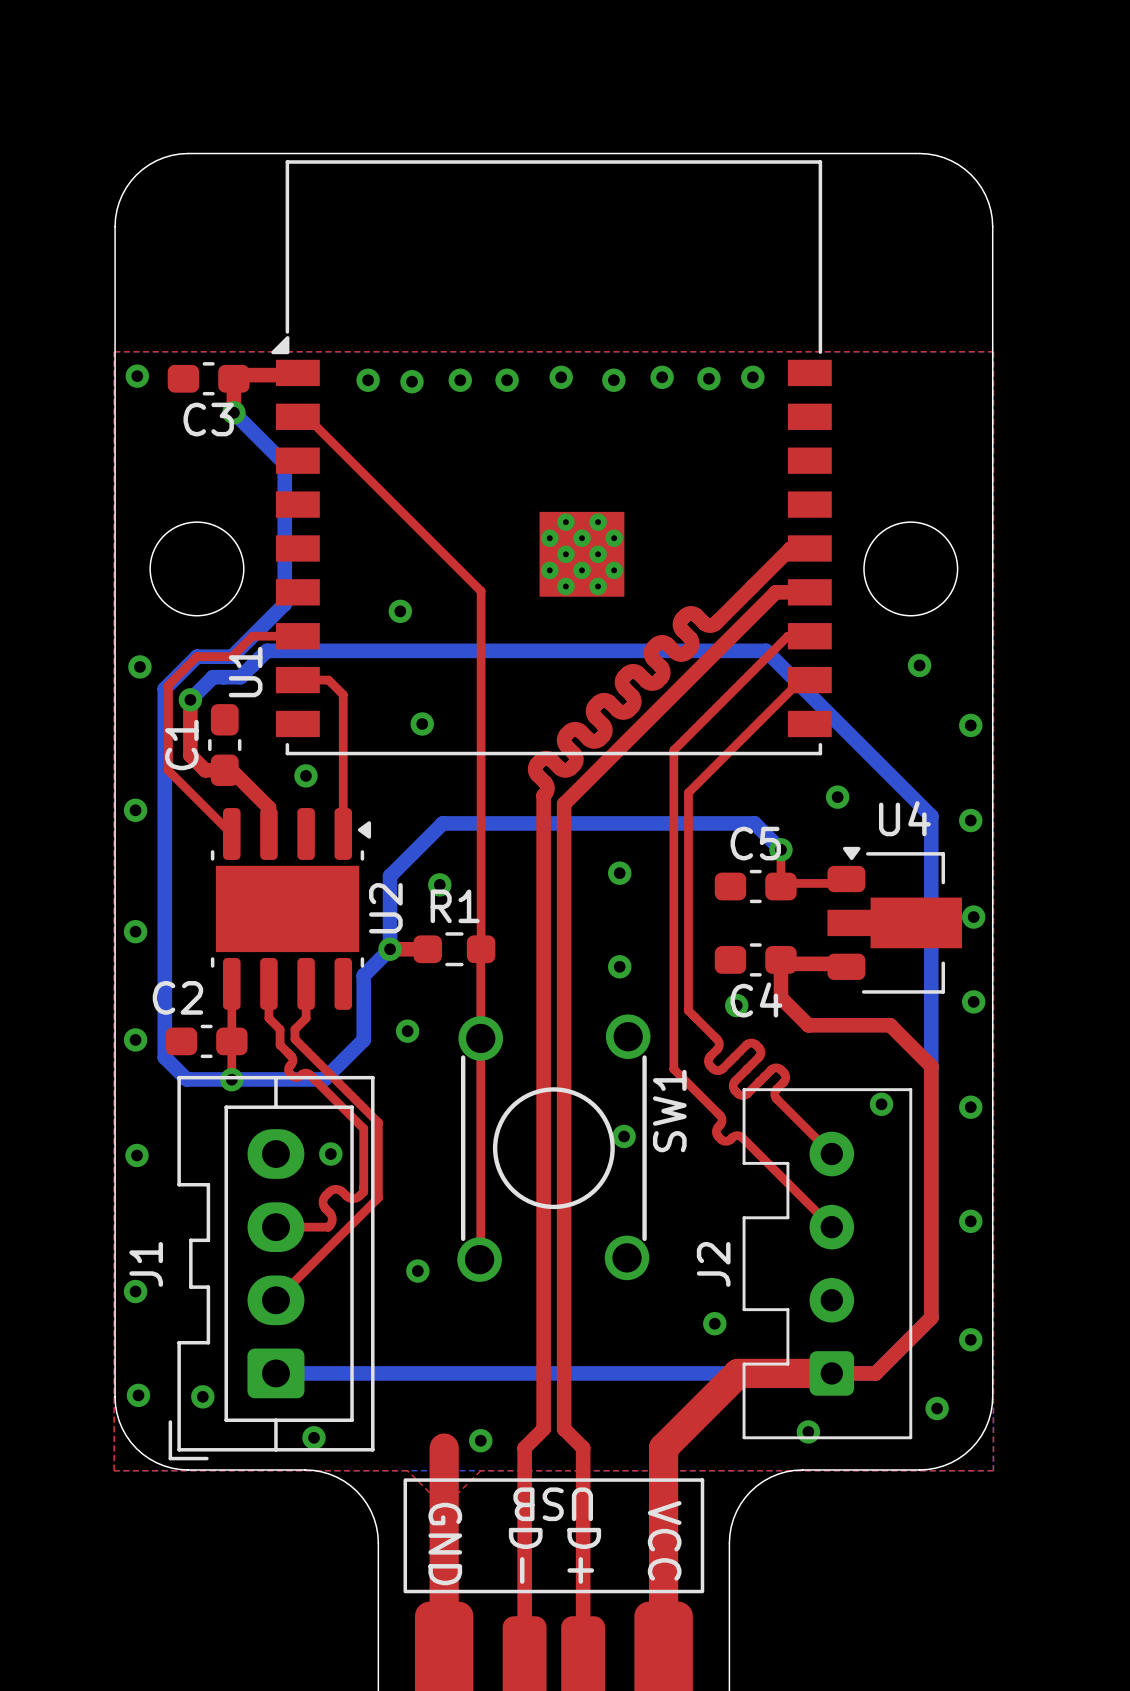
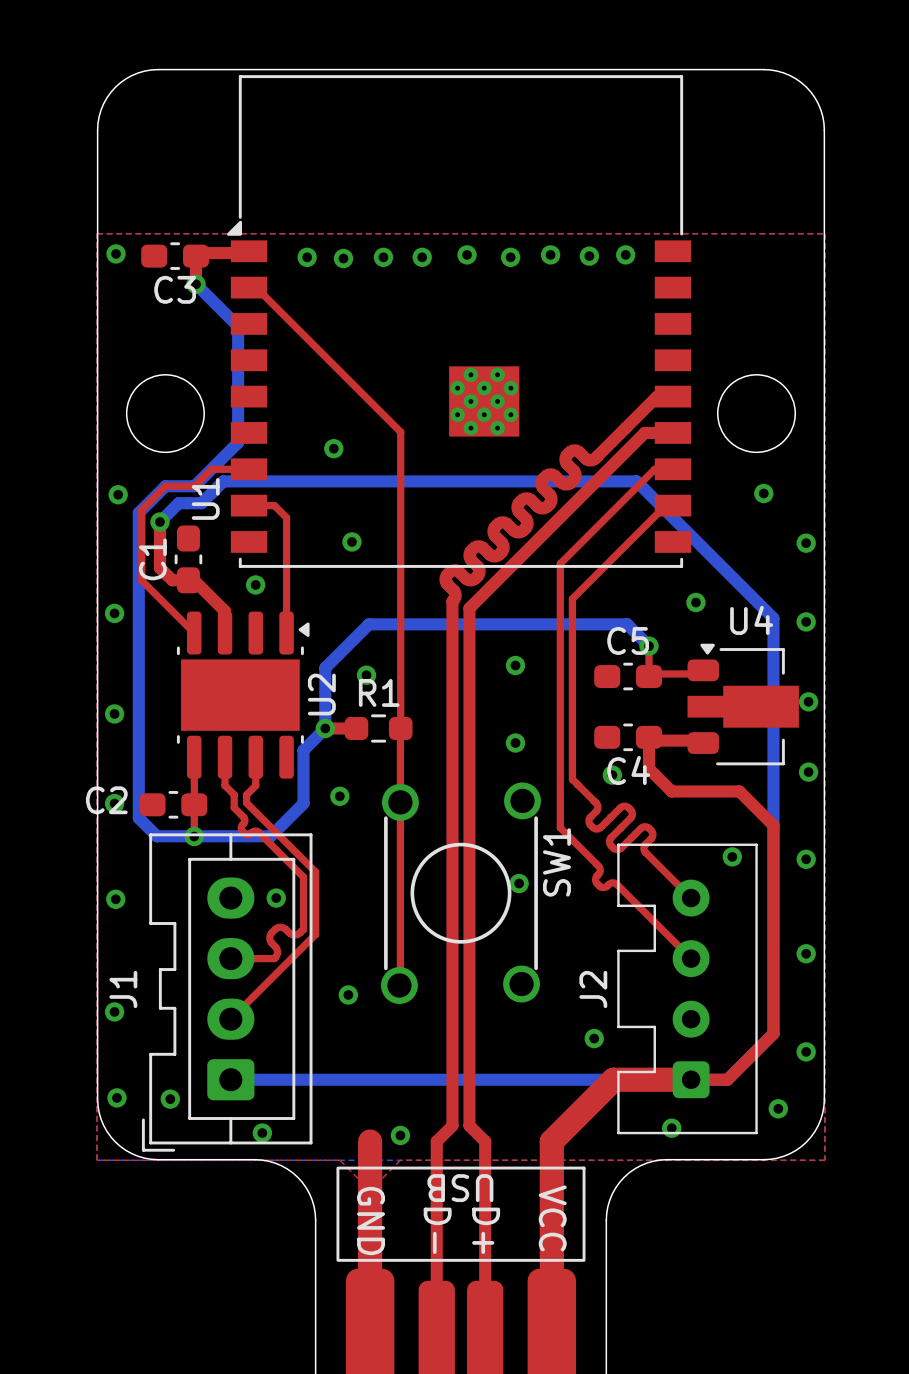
C2 name position: C2 (177, 997) -> C2 (106, 800)

